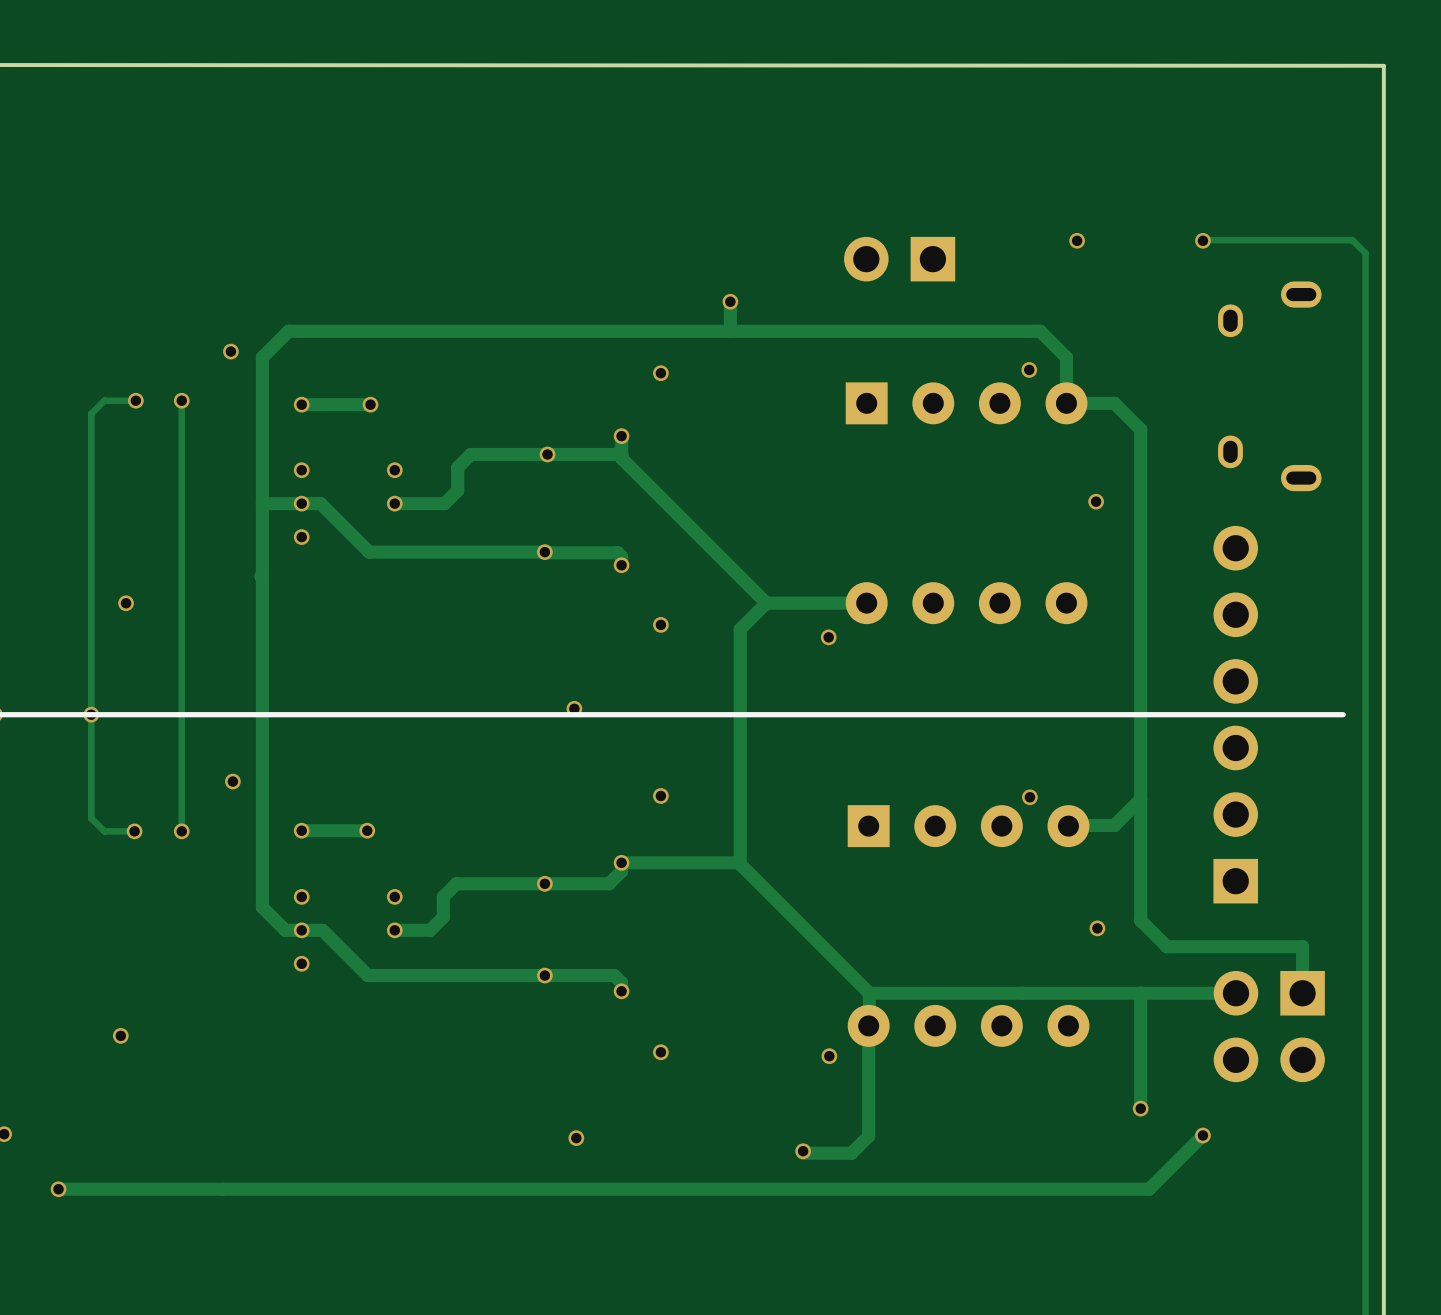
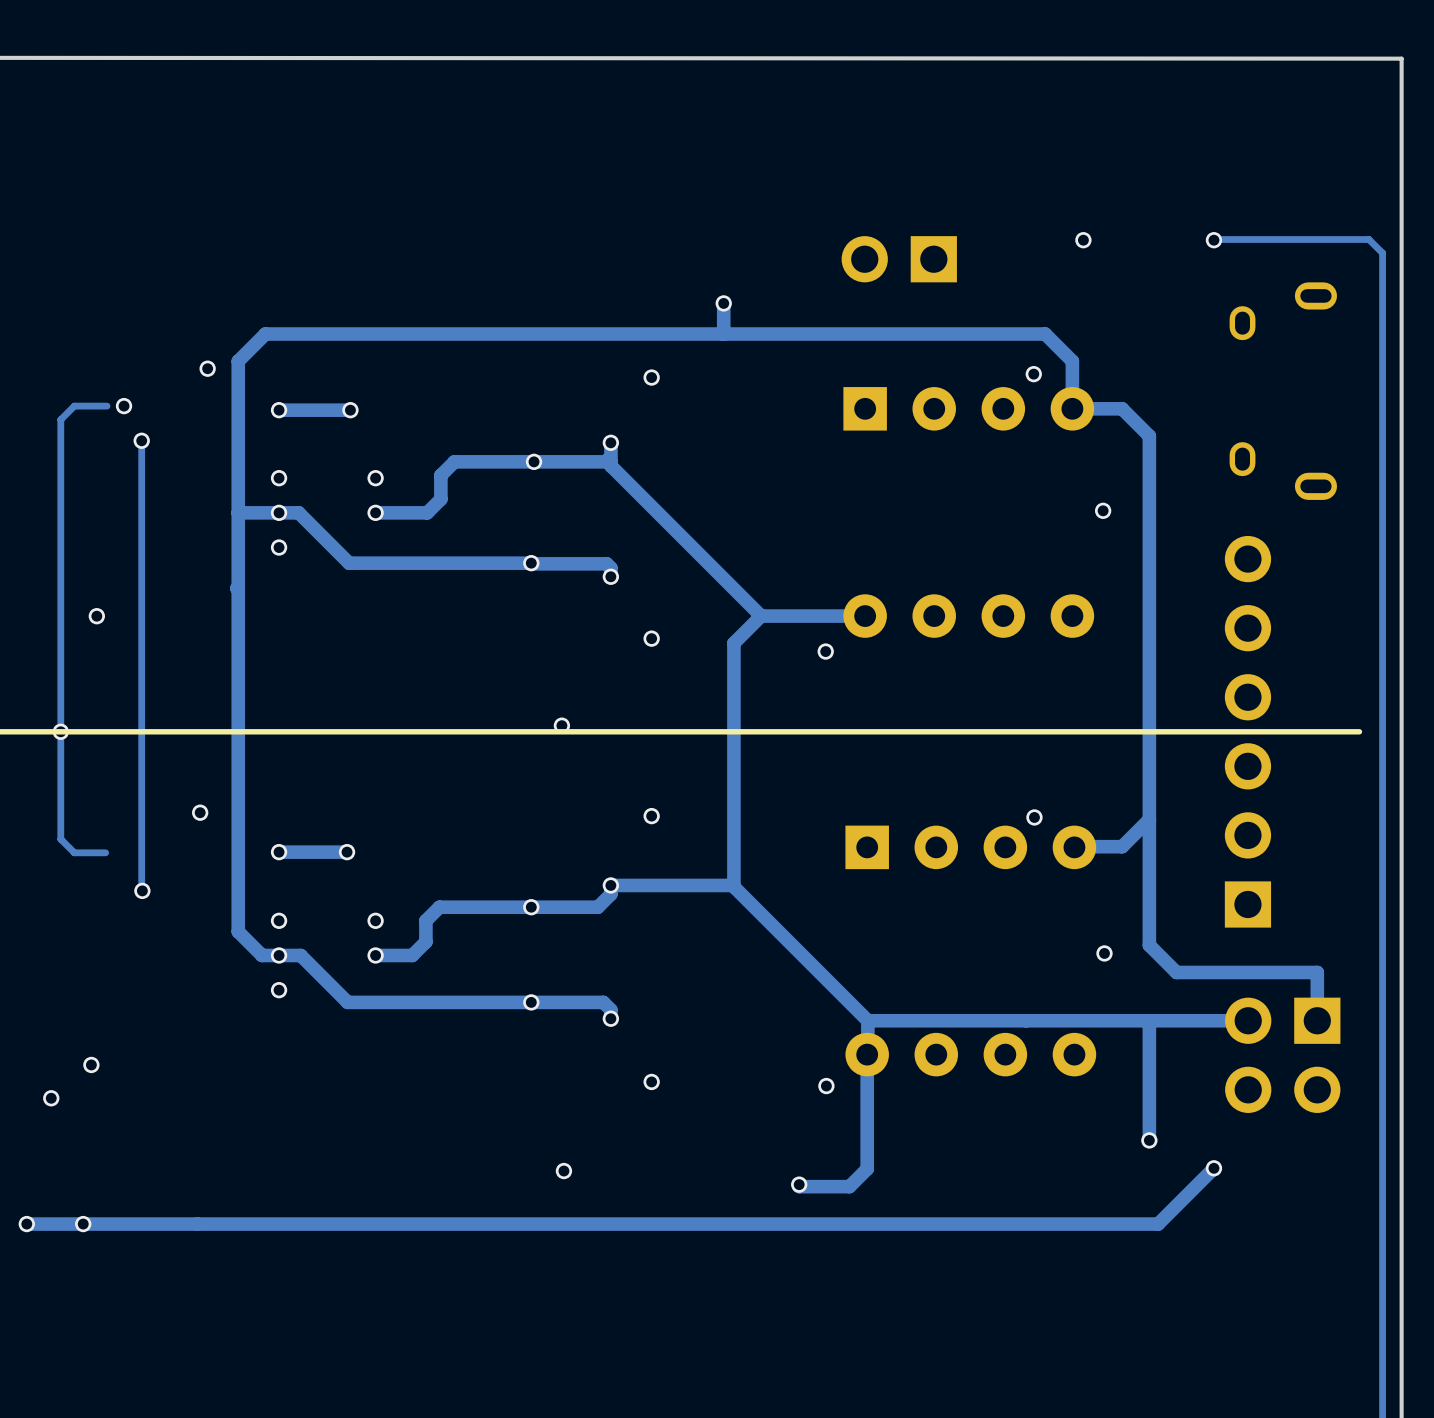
via position: (230, 351) -> (207, 368)
via: (135, 400) -> none
via: none -> (124, 406)
track: (181, 400) (181, 831) -> none
via: (181, 400) -> none
track: none -> (141, 440) (142, 890)
via: none -> (141, 440)
via position: (232, 781) -> (200, 812)
via: (134, 831) -> none
via: (181, 831) -> none
via: none -> (142, 890)
via: none -> (51, 1098)
via: none -> (83, 1224)

